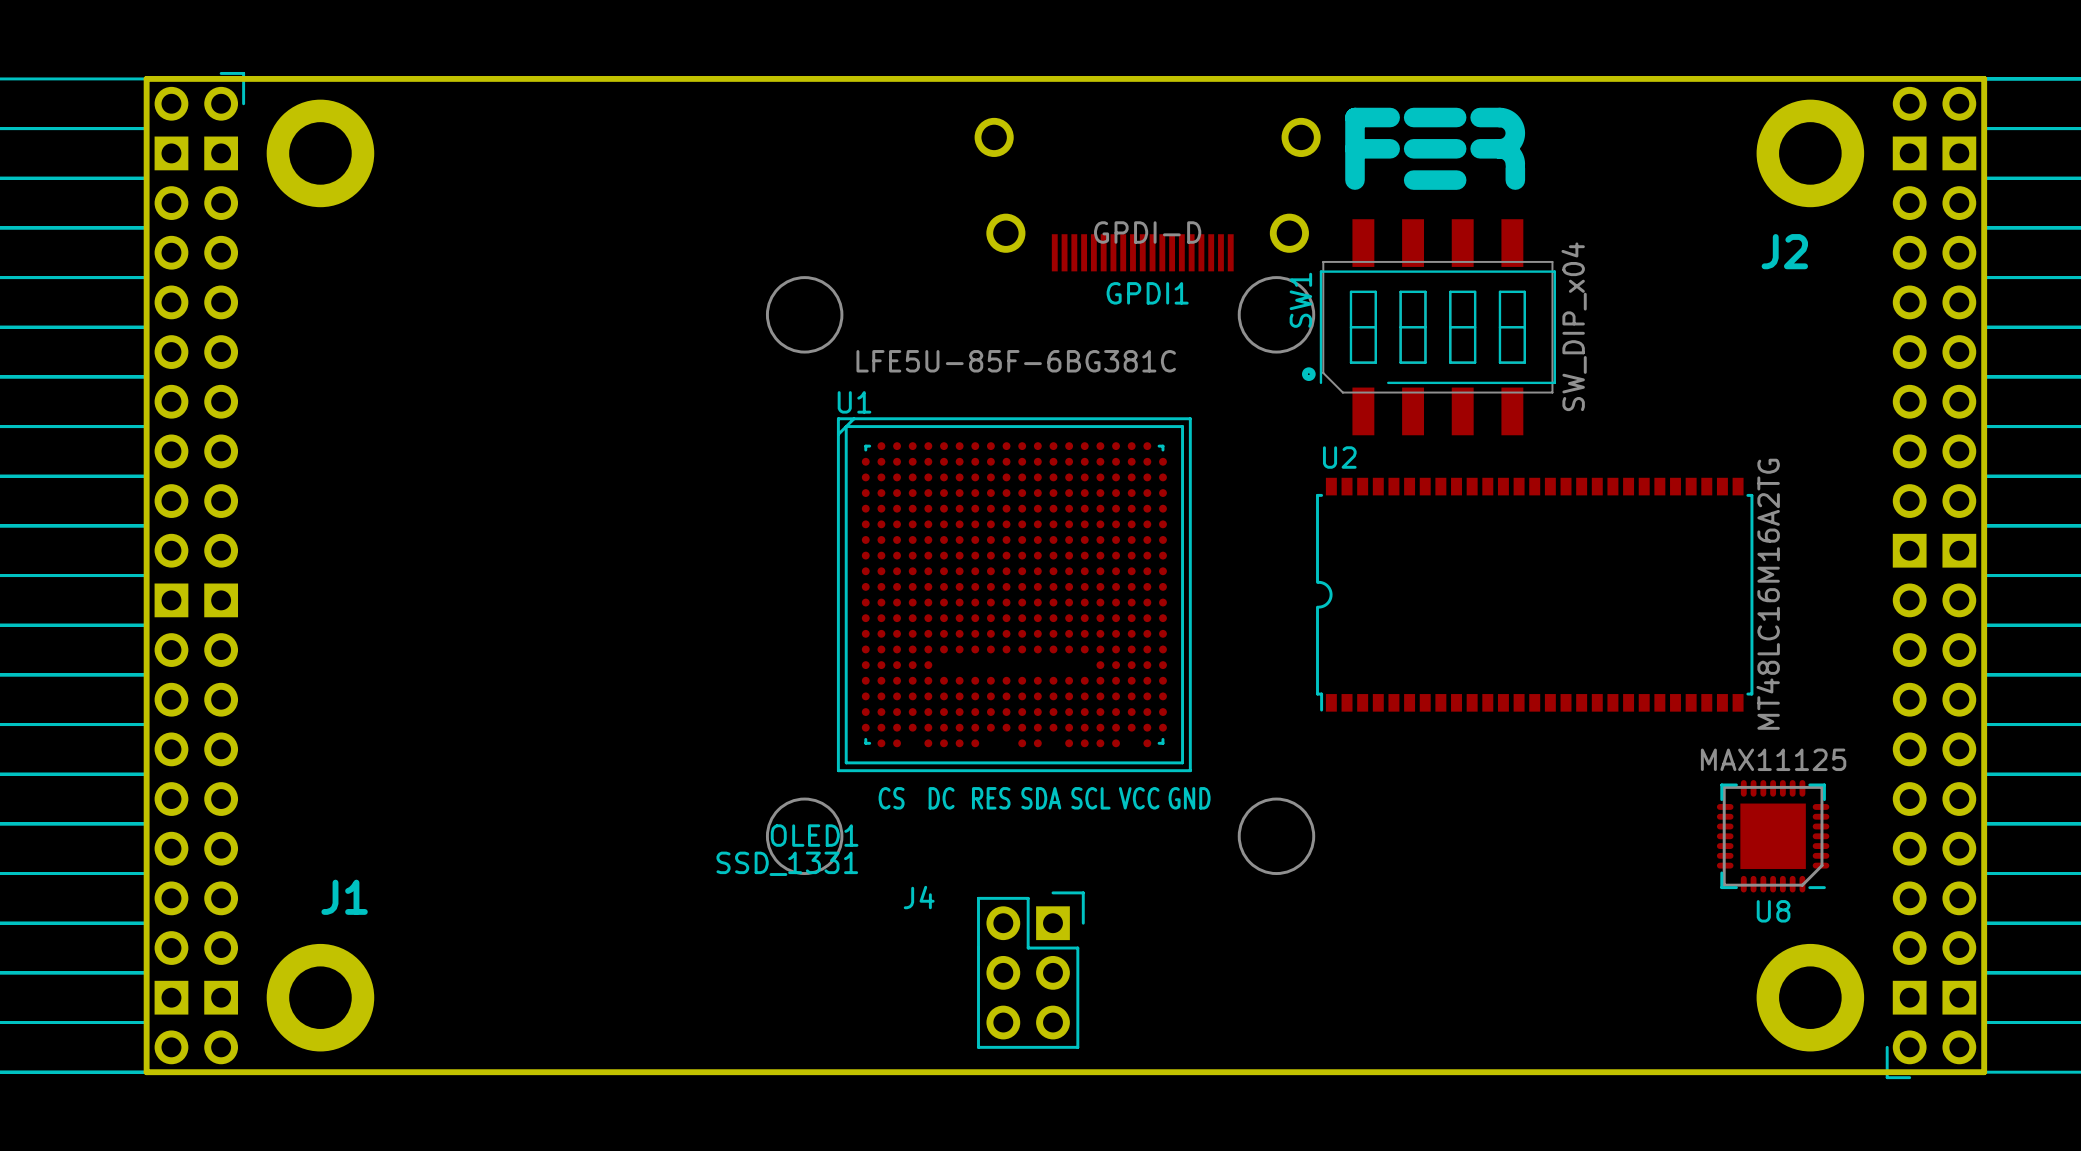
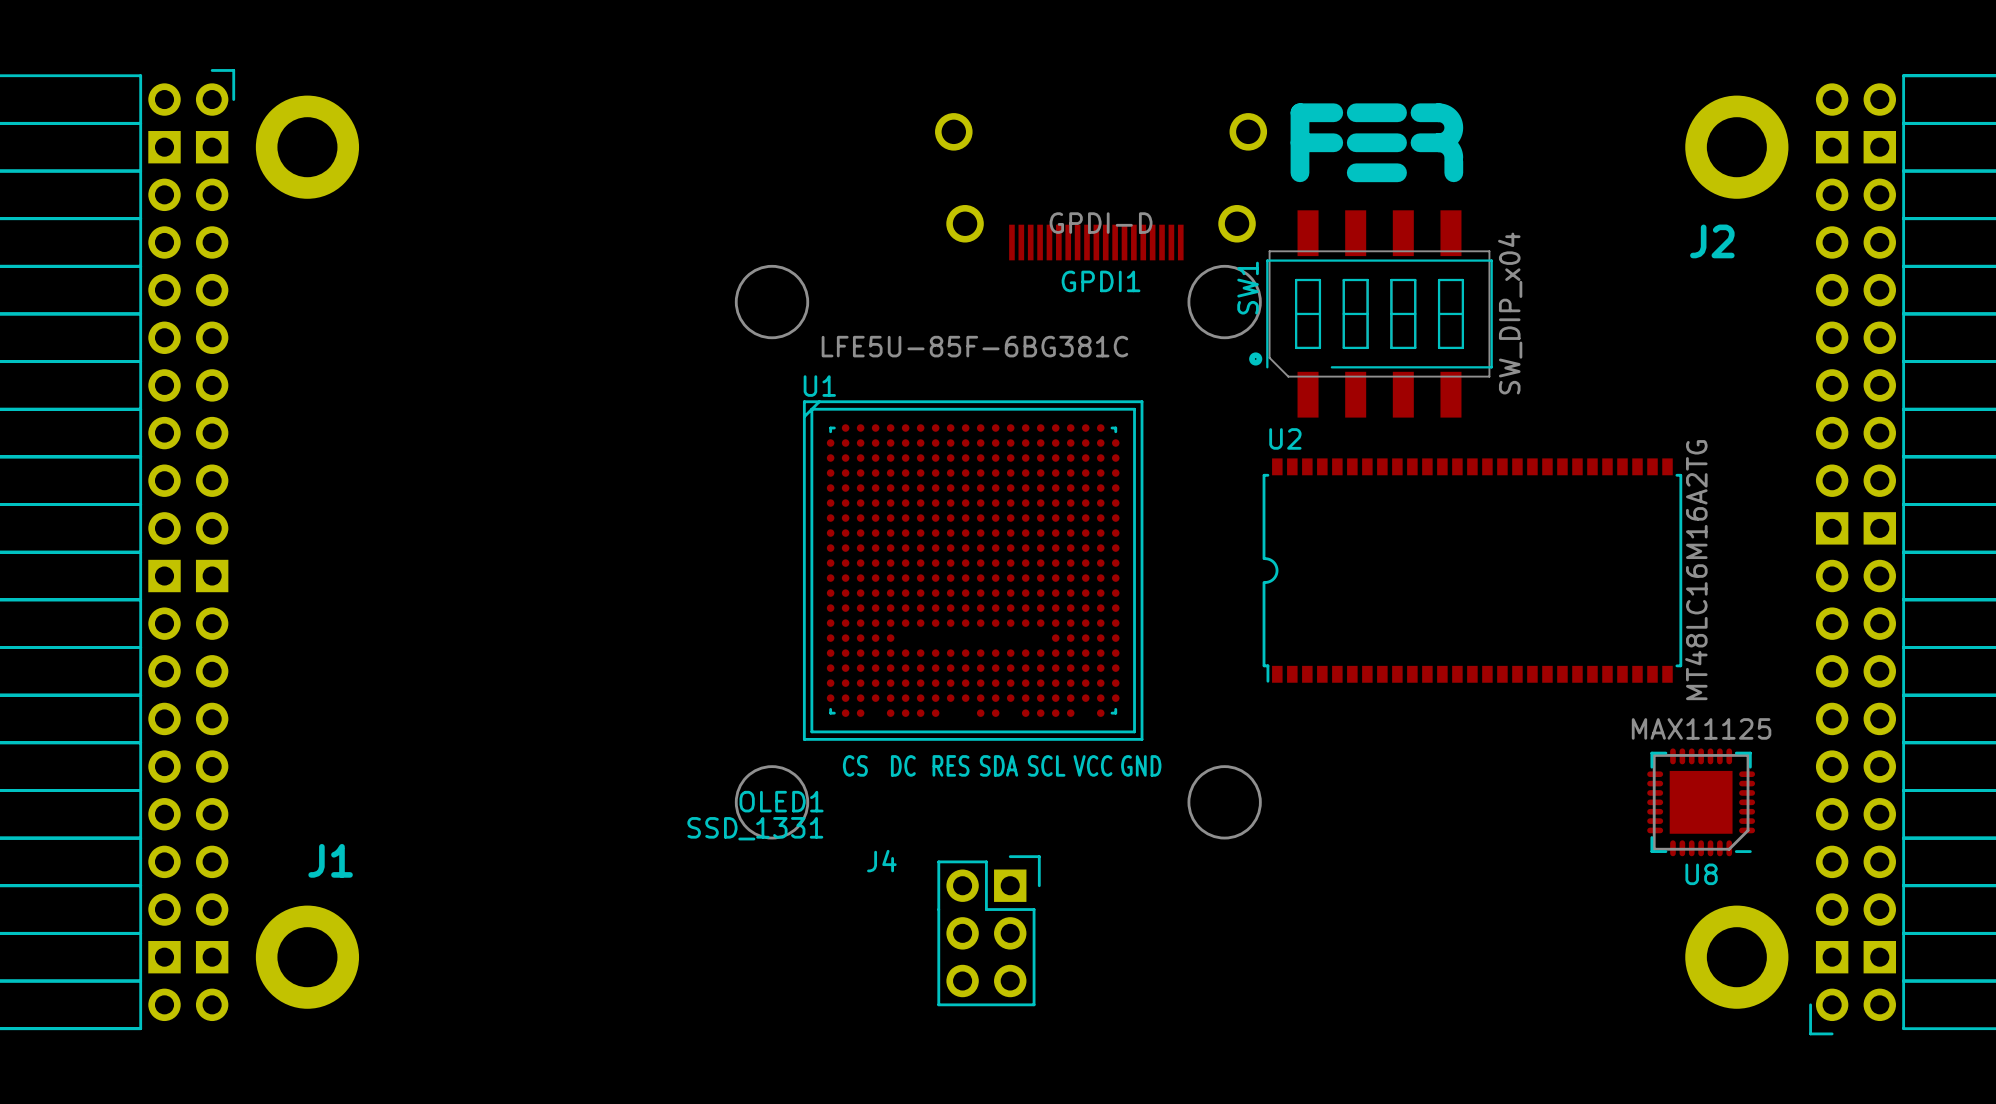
board edge: (146, 78) (146, 1072) (1984, 1072) (1984, 78) (146, 78) -> none

